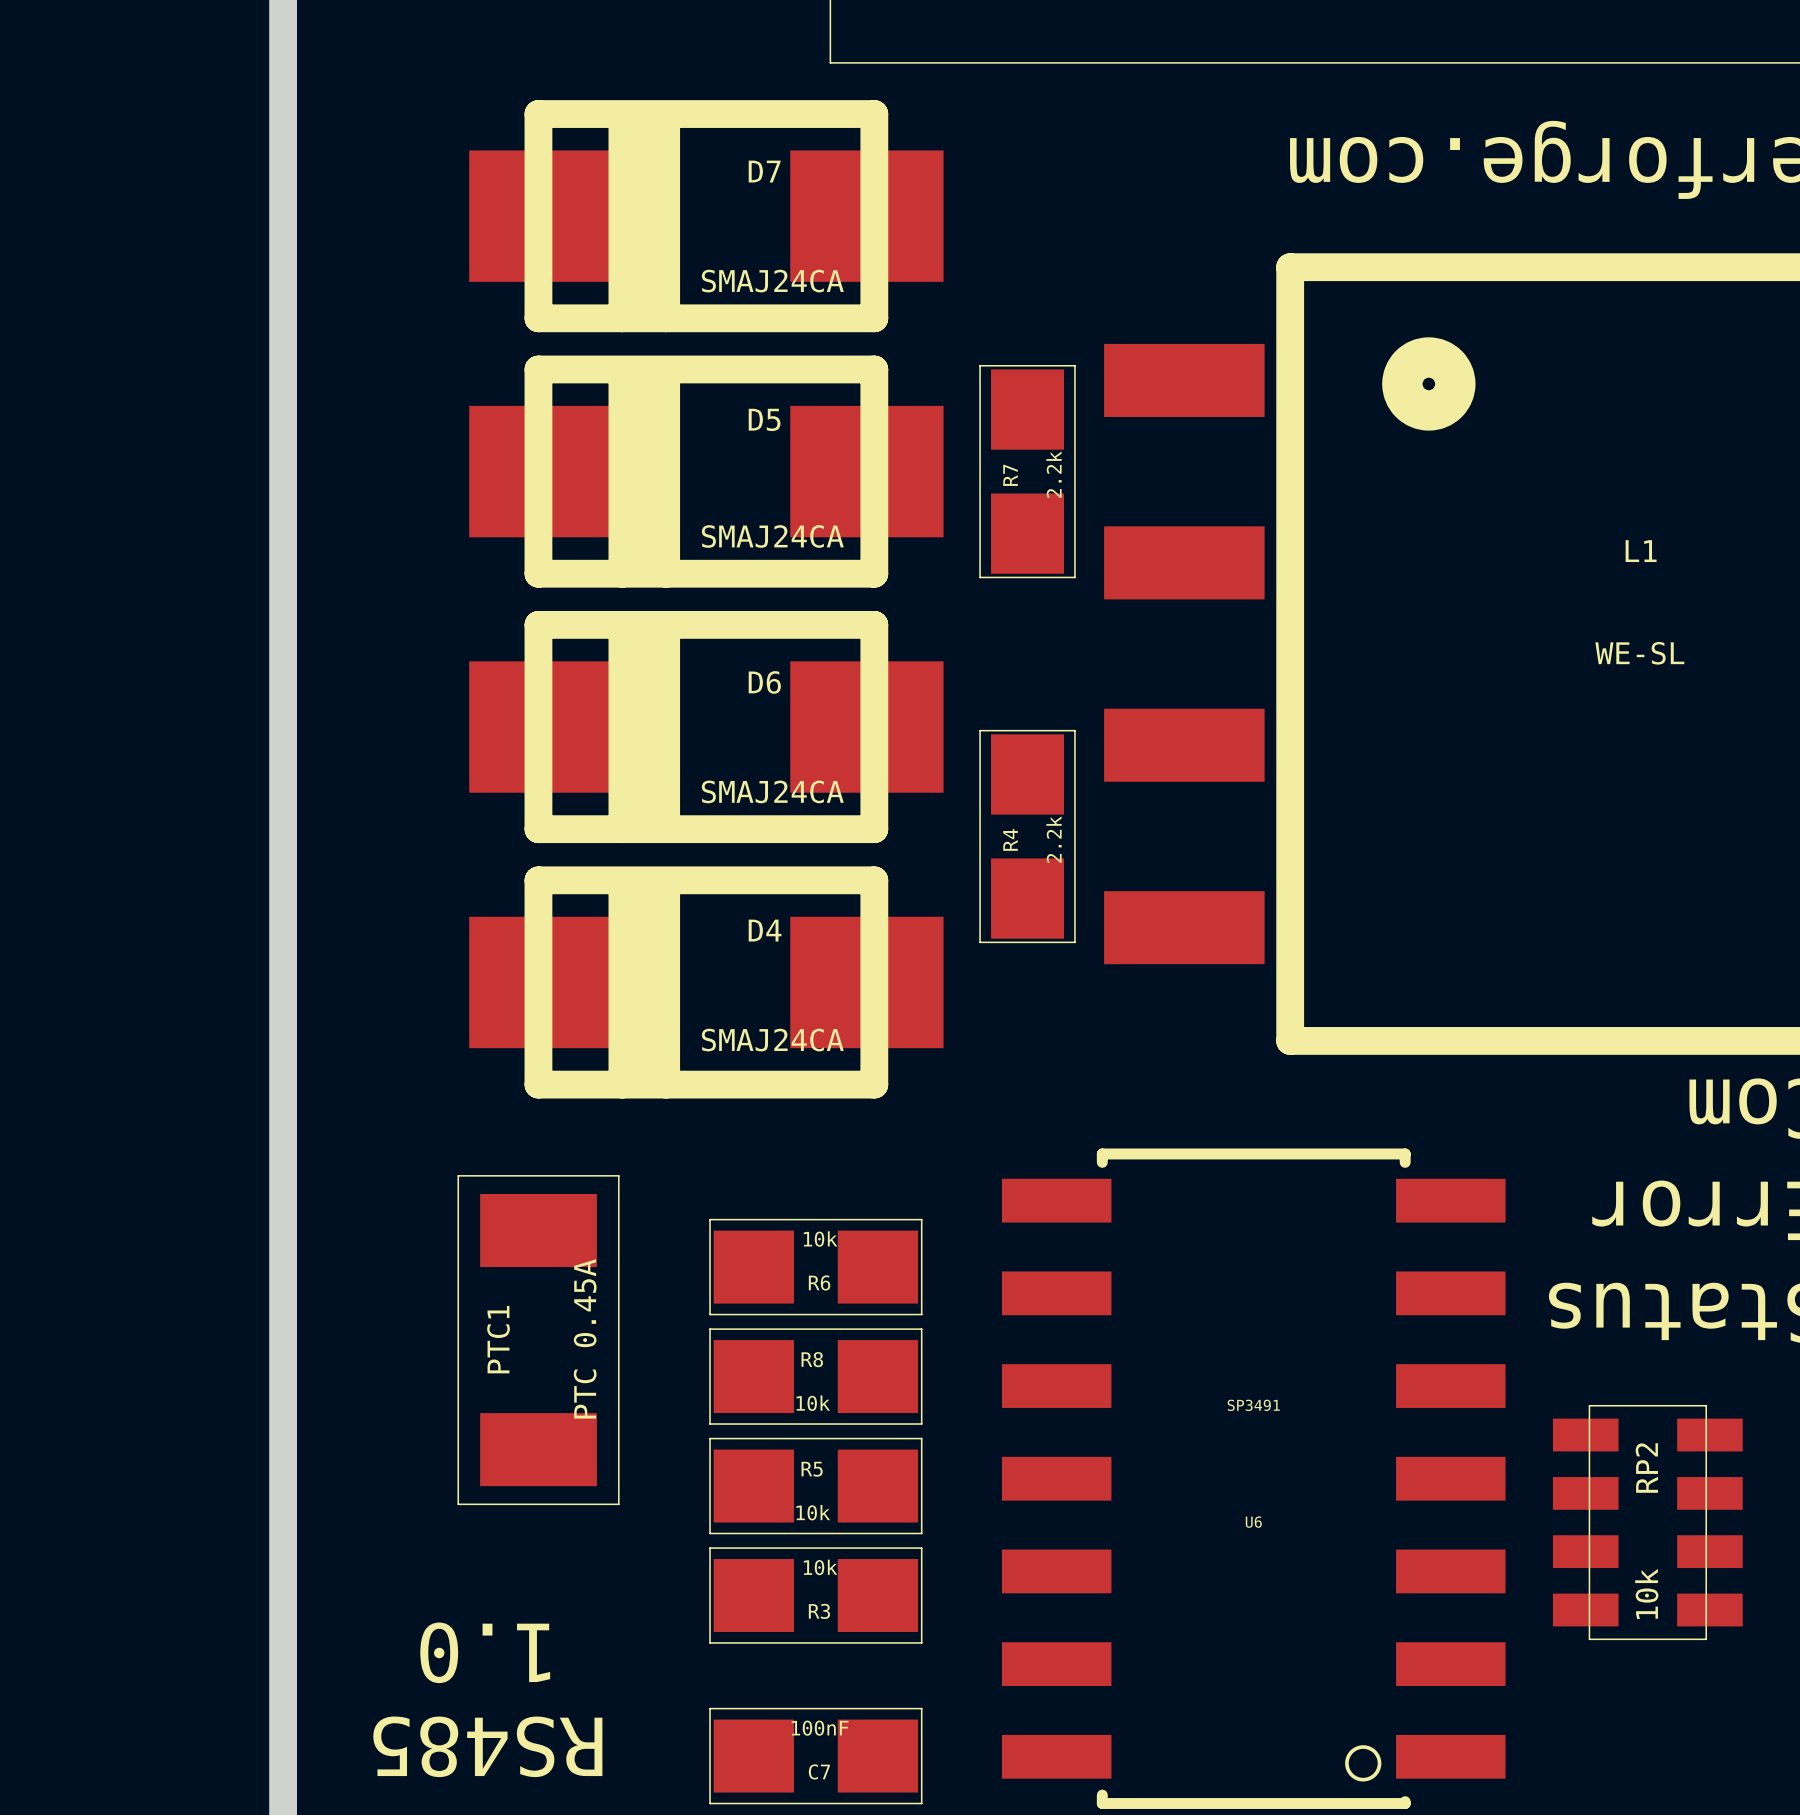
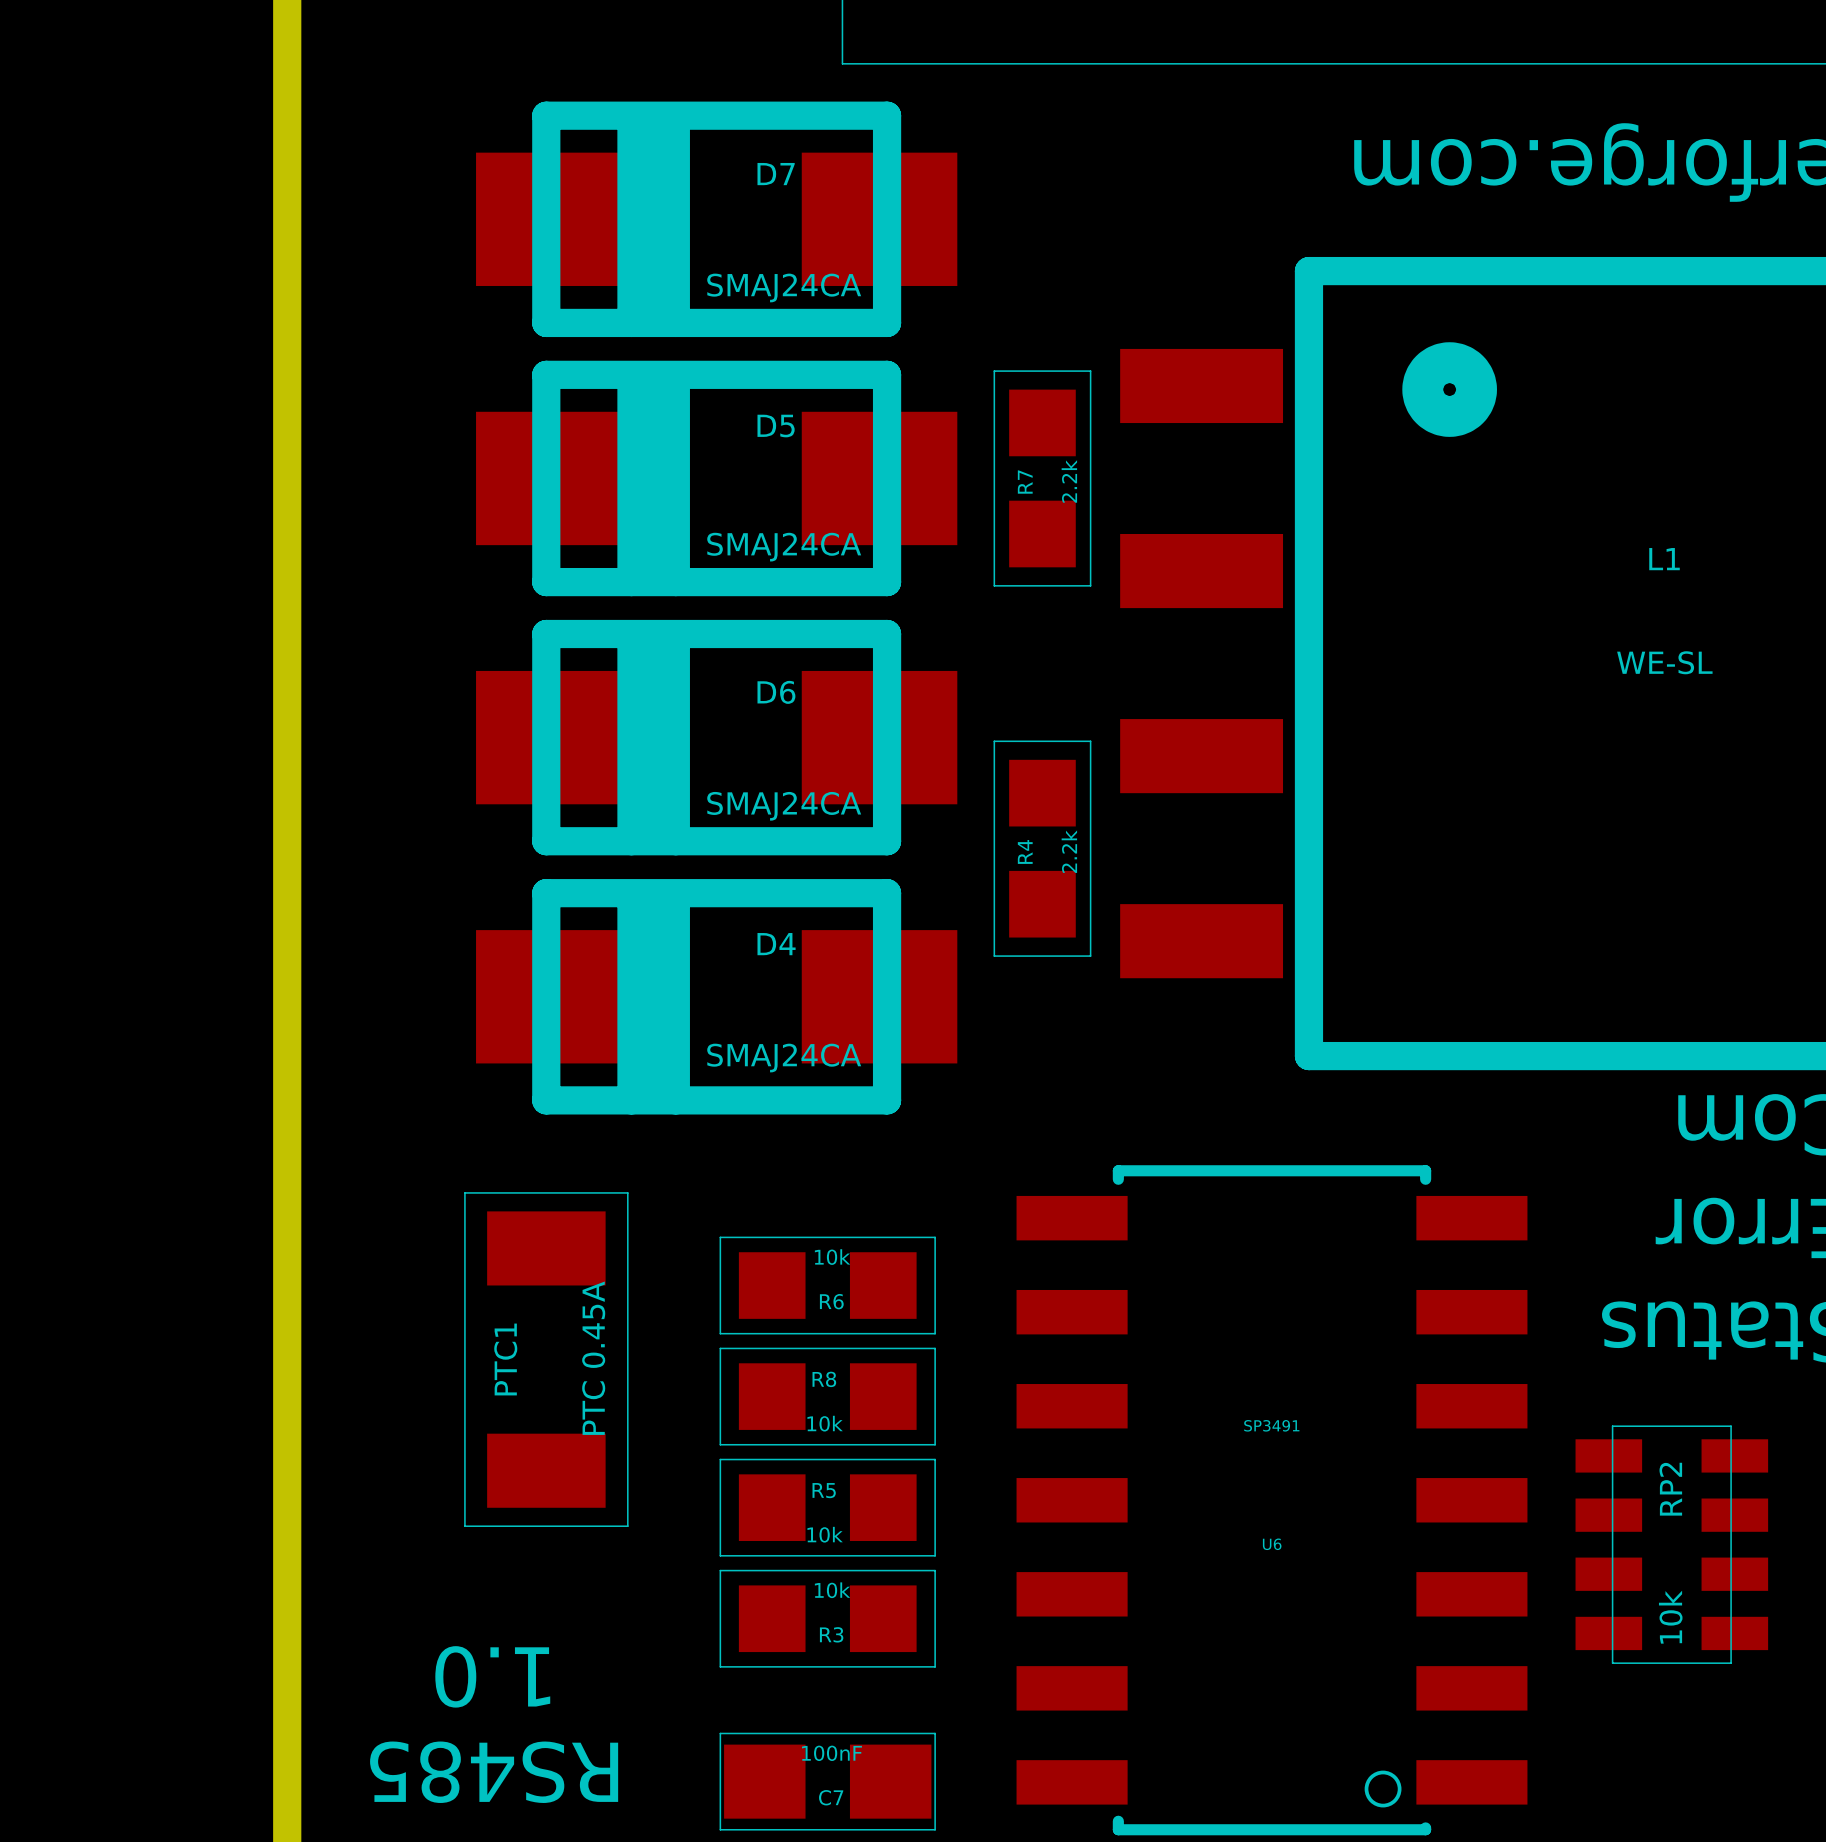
R7 footprint: [980, 365, 1075, 578] -> [994, 371, 1091, 586]
R4 footprint: [980, 730, 1075, 943] -> [994, 741, 1091, 957]
R6 footprint: [709, 1219, 922, 1315] -> [720, 1237, 936, 1334]
R8 footprint: [709, 1329, 922, 1425] -> [720, 1348, 936, 1445]
R5 footprint: [709, 1438, 922, 1534] -> [720, 1459, 936, 1556]
R3 footprint: [709, 1548, 922, 1643] -> [720, 1570, 936, 1667]

